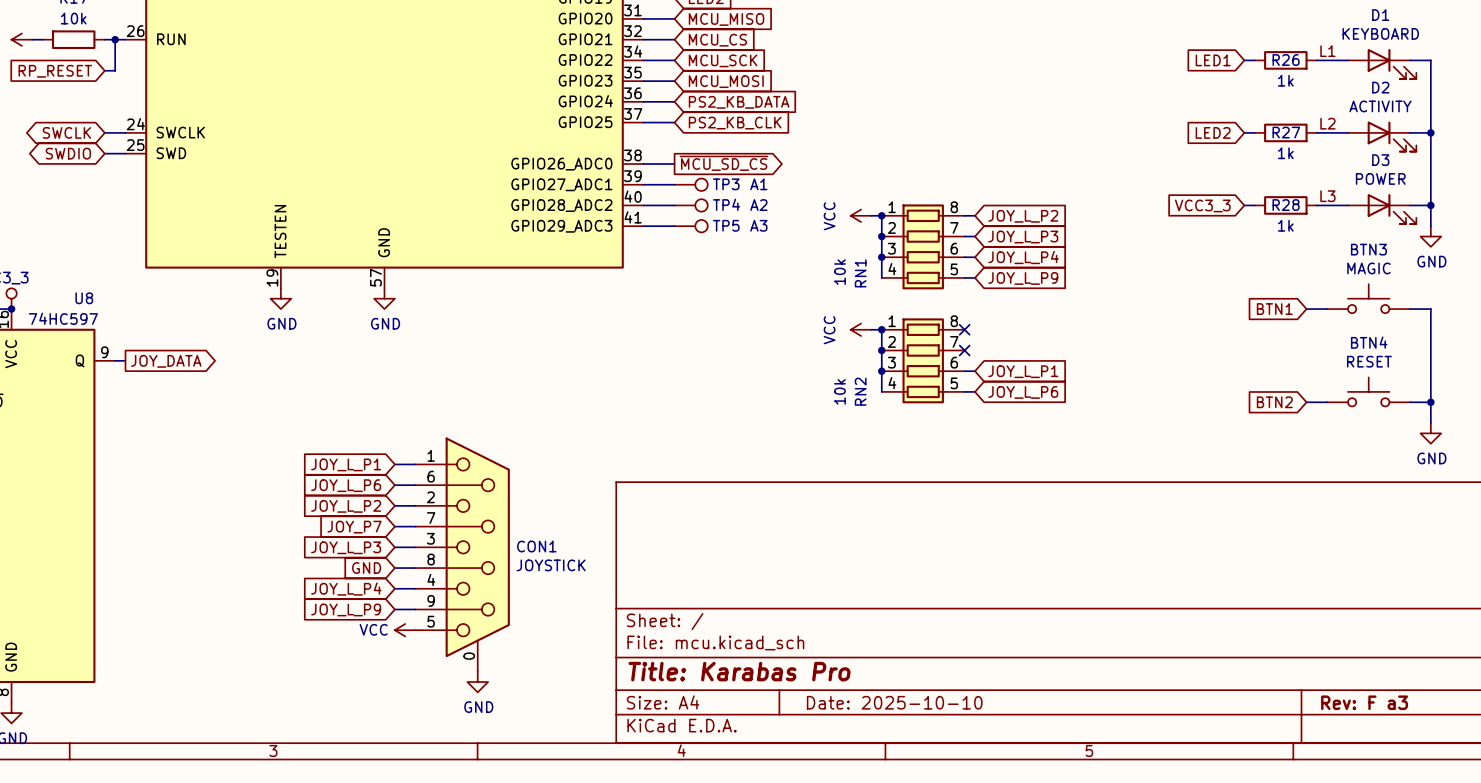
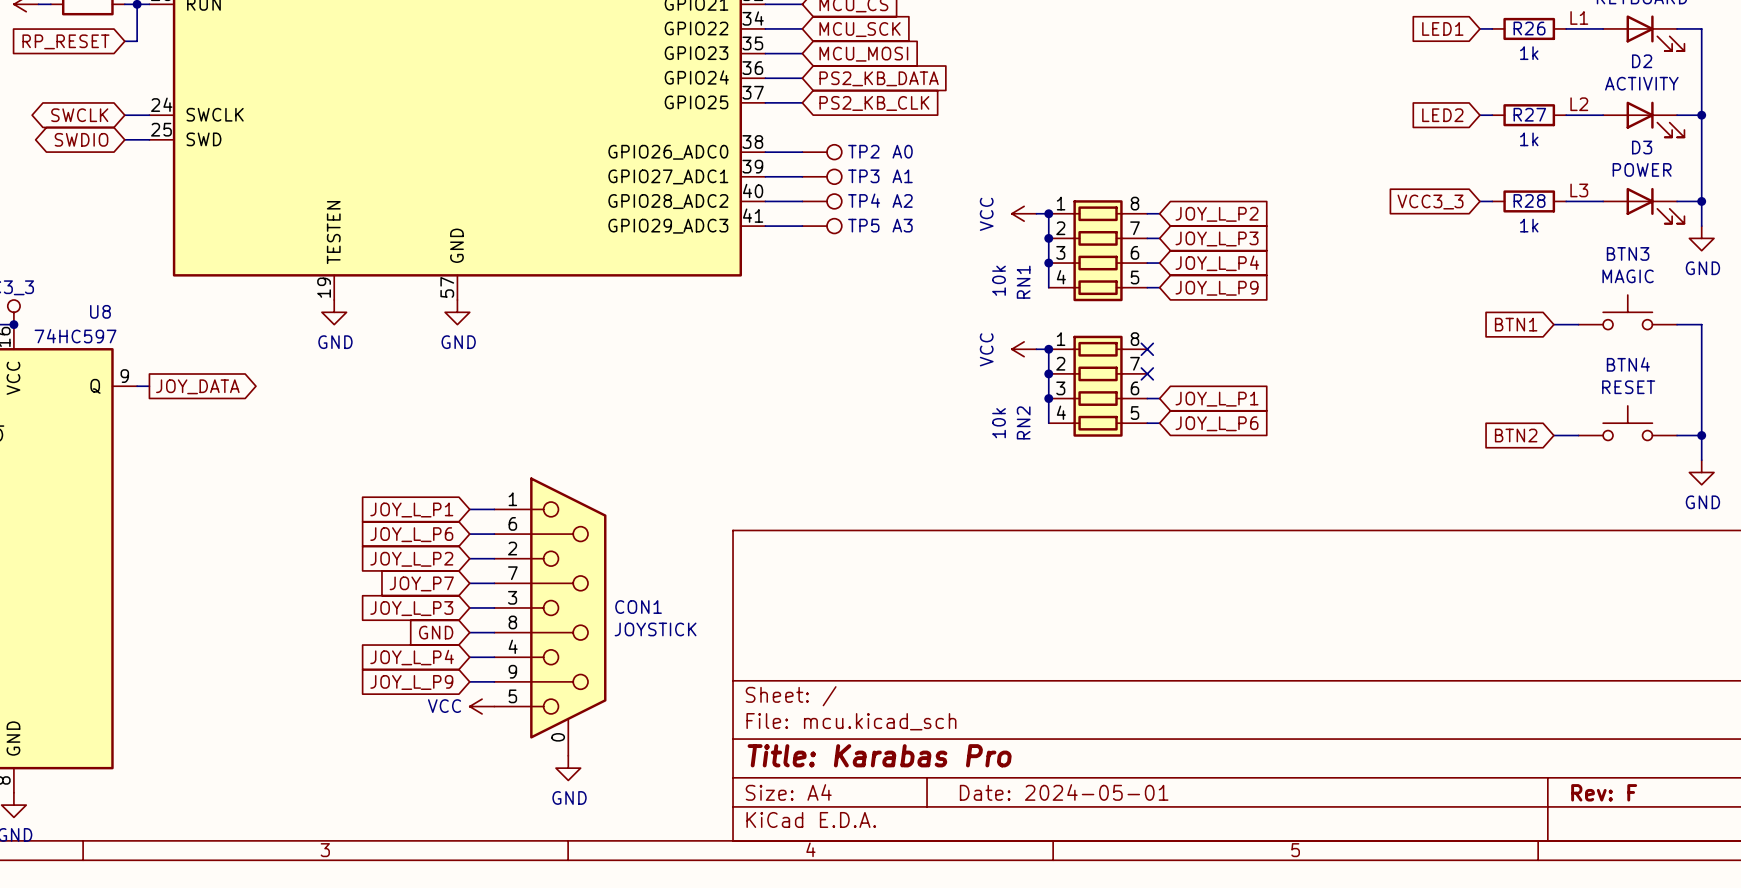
global label: ~{MCU_SD_CS} (723, 163) -> none
TP2: none -> A0 (822, 152)
title block: Date: 2025-10-10 (894, 702) -> Date: 2024-05-01 (1064, 792)
title block: Rev: F a3 (1364, 702) -> Rev: F (1604, 792)

